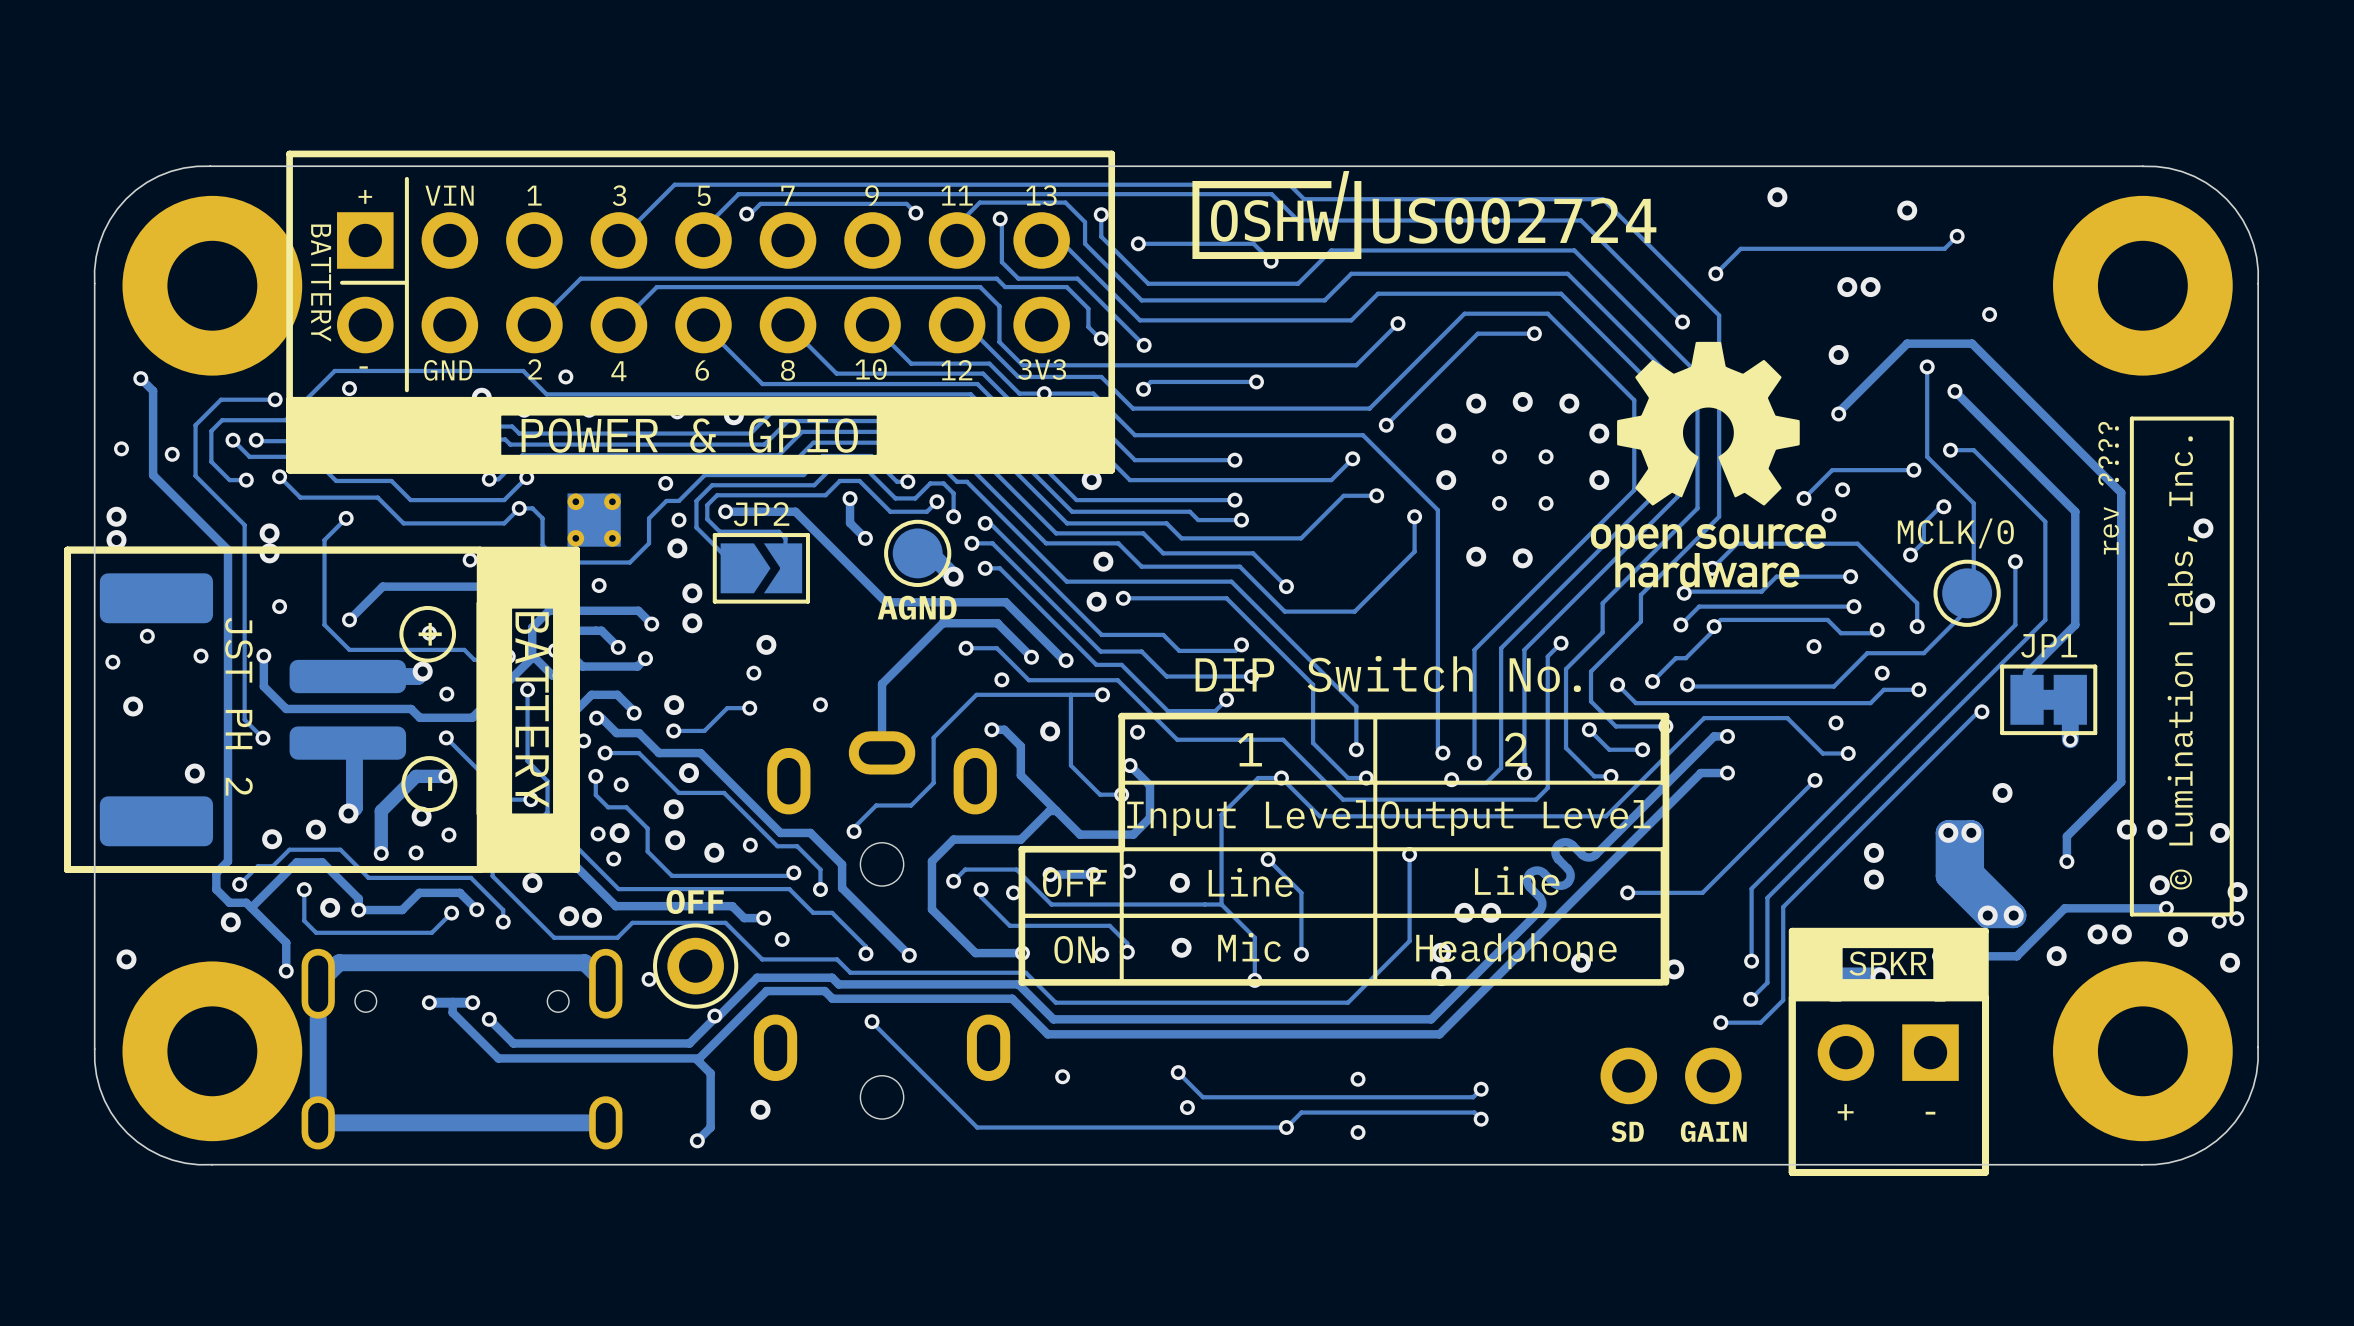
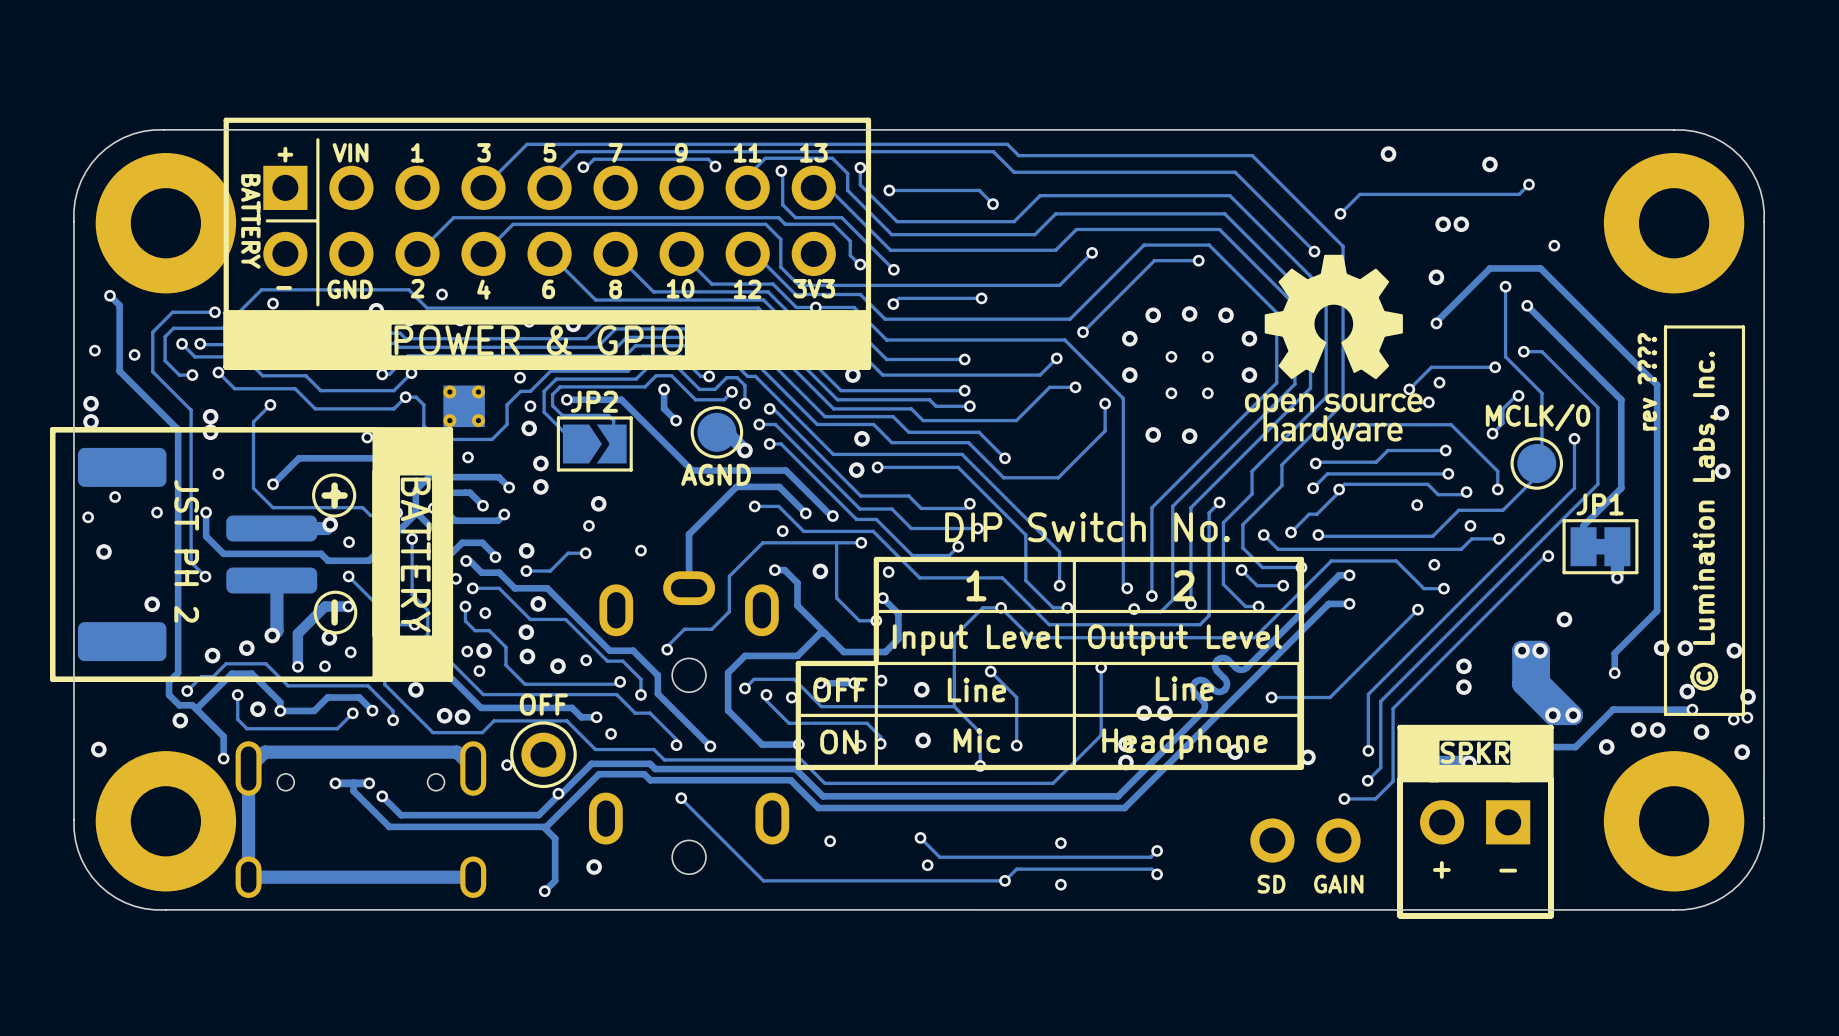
drawing: [1192, 170, 1657, 260] -> none
drawing shape: [1617, 341, 1800, 506] -> [1264, 254, 1403, 380]
drawing: none -> [1280, 393, 1423, 442]
drawing shape: [1590, 524, 1612, 550] -> [1244, 393, 1261, 413]
drawing shape: [1615, 524, 1636, 588] -> [1263, 393, 1279, 442]
drawing: [1638, 524, 1826, 588] -> none

